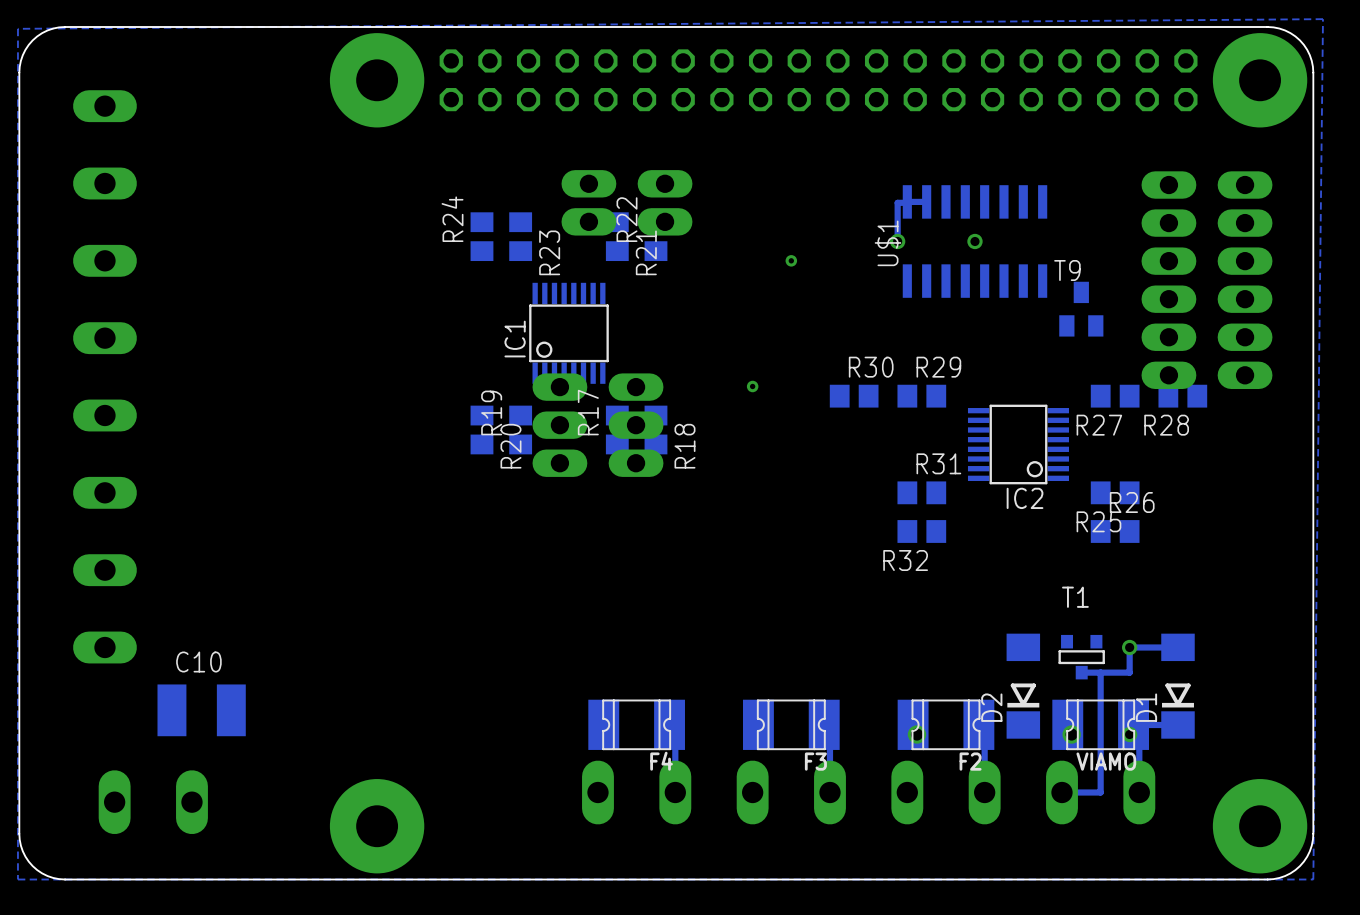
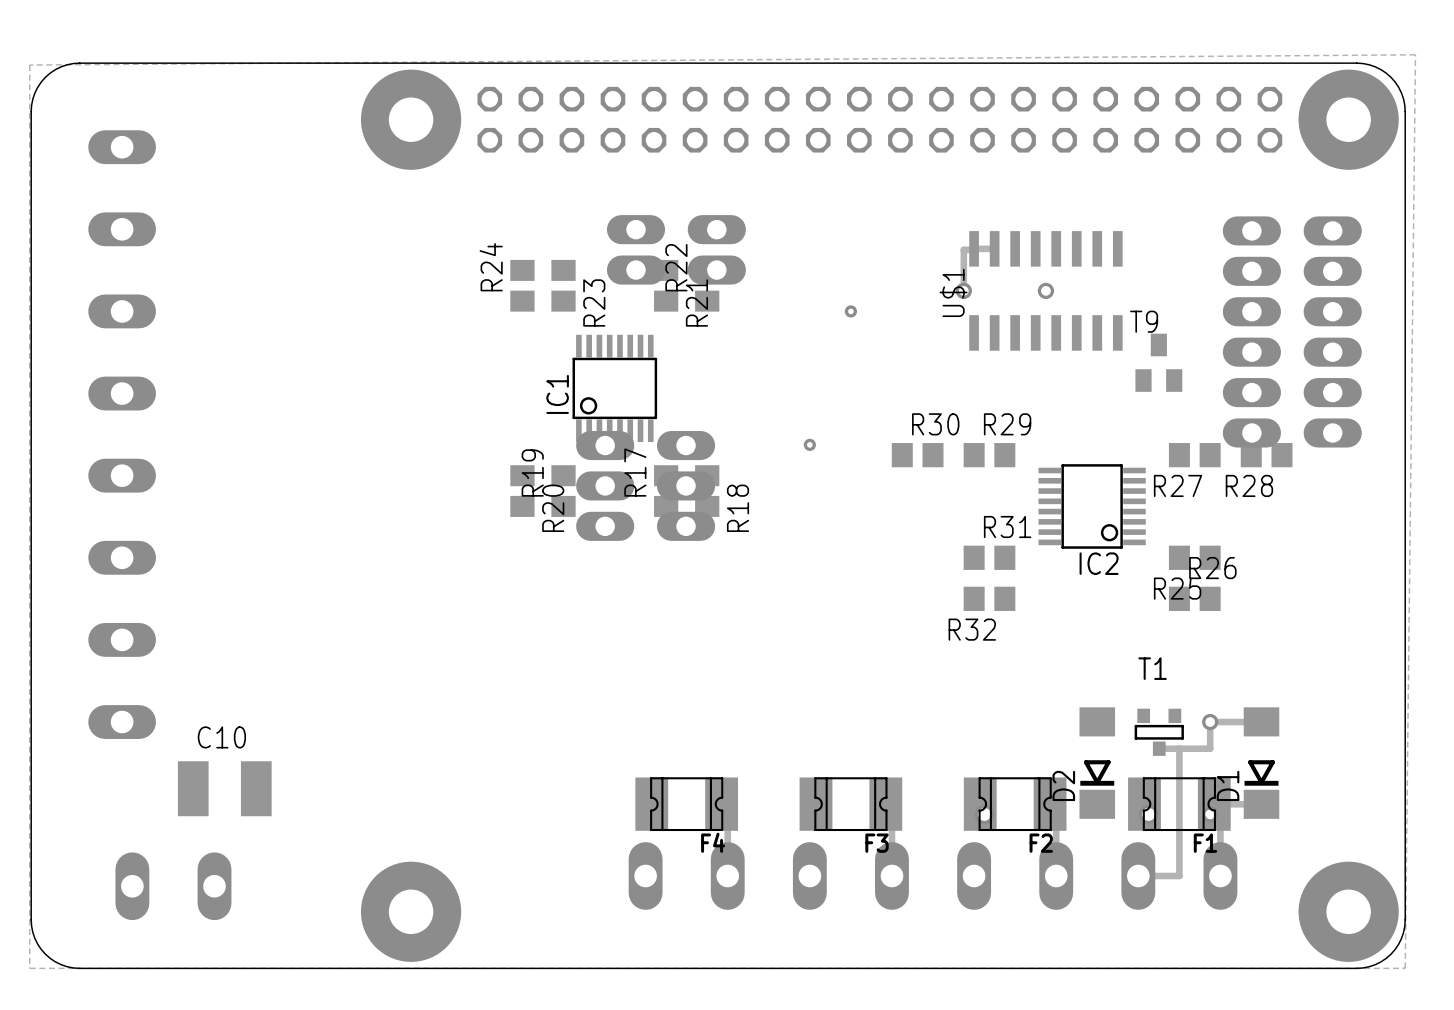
VIAMO name: VIAMO (1106, 761) -> F1 (1205, 843)

